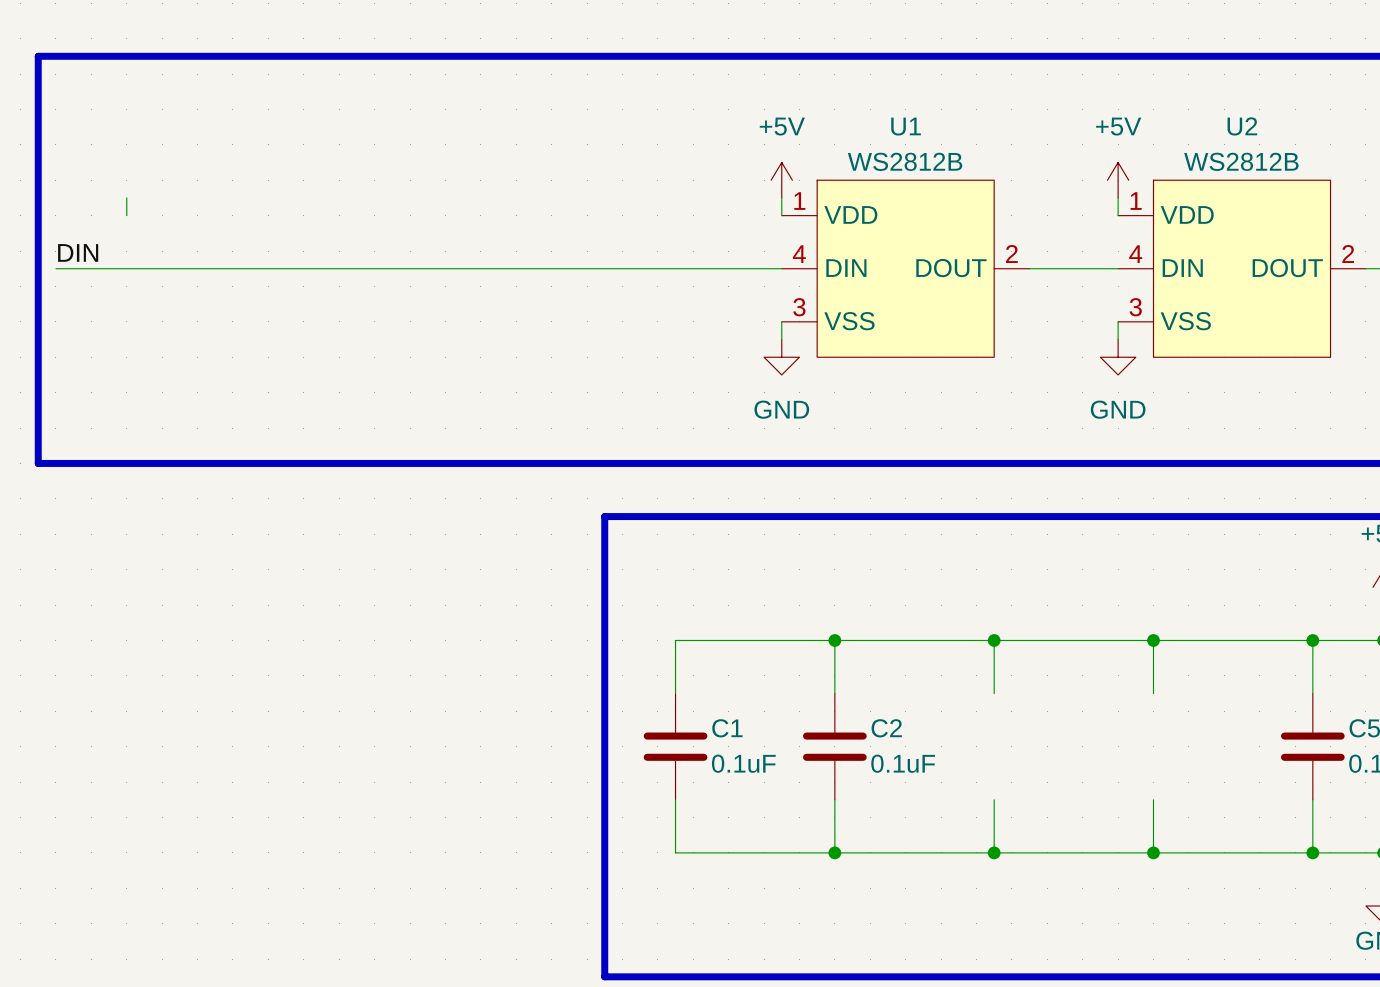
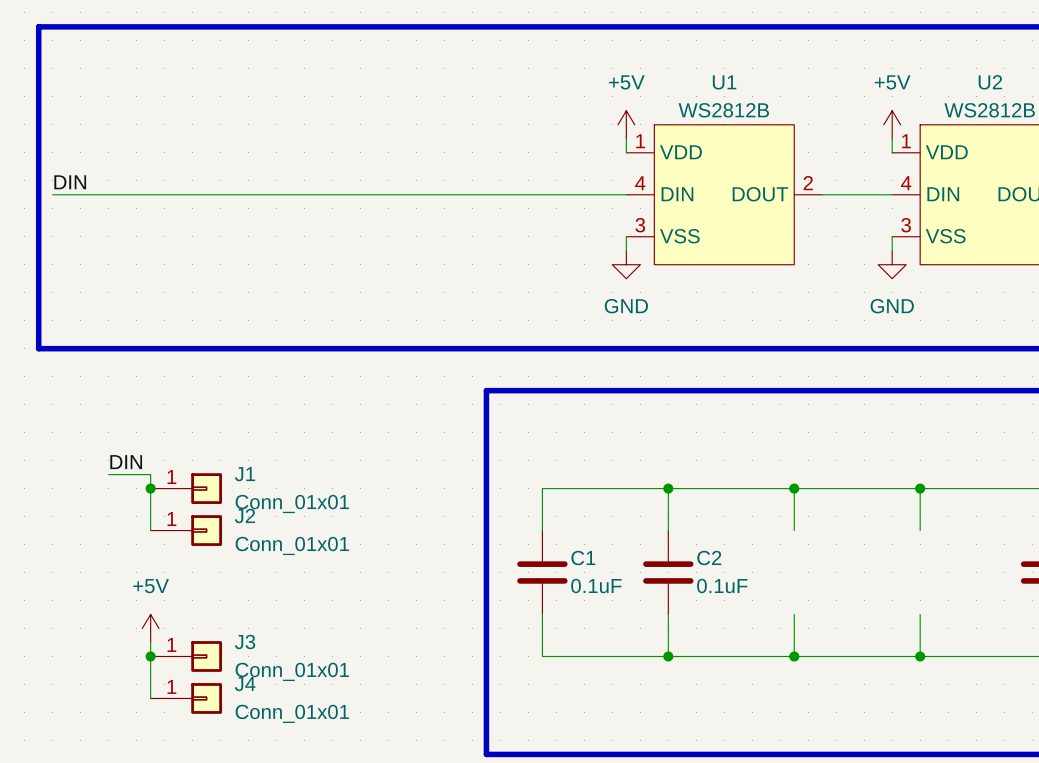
wire: (126, 197) (126, 215) -> none
label: none -> DIN (126, 462)
wire: none -> (108, 474) (150, 474) (150, 530)
junction: none -> (150, 488)
J1: none -> Conn_01x01 (186, 488)
J2: none -> Conn_01x01 (186, 530)
power symbol: none -> +5V (150, 628)
wire: none -> (150, 642) (150, 698)
junction: none -> (150, 656)
J3: none -> Conn_01x01 (186, 656)
J4: none -> Conn_01x01 (186, 698)

